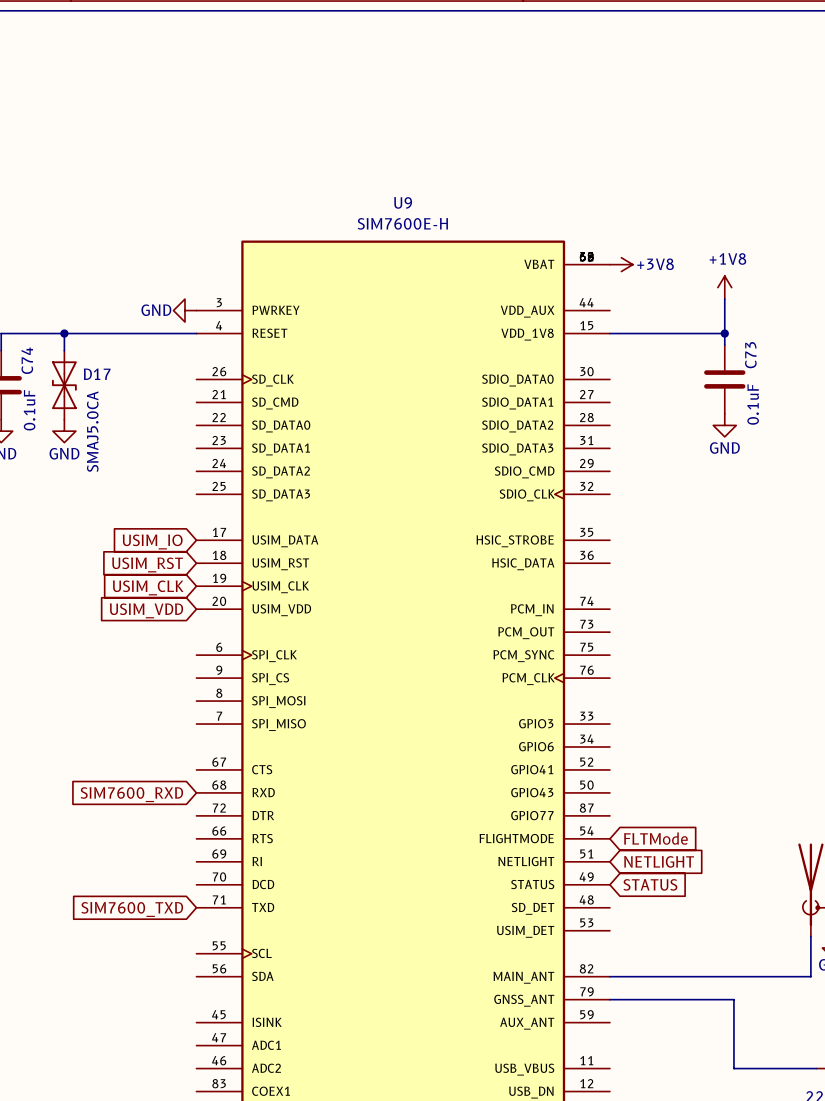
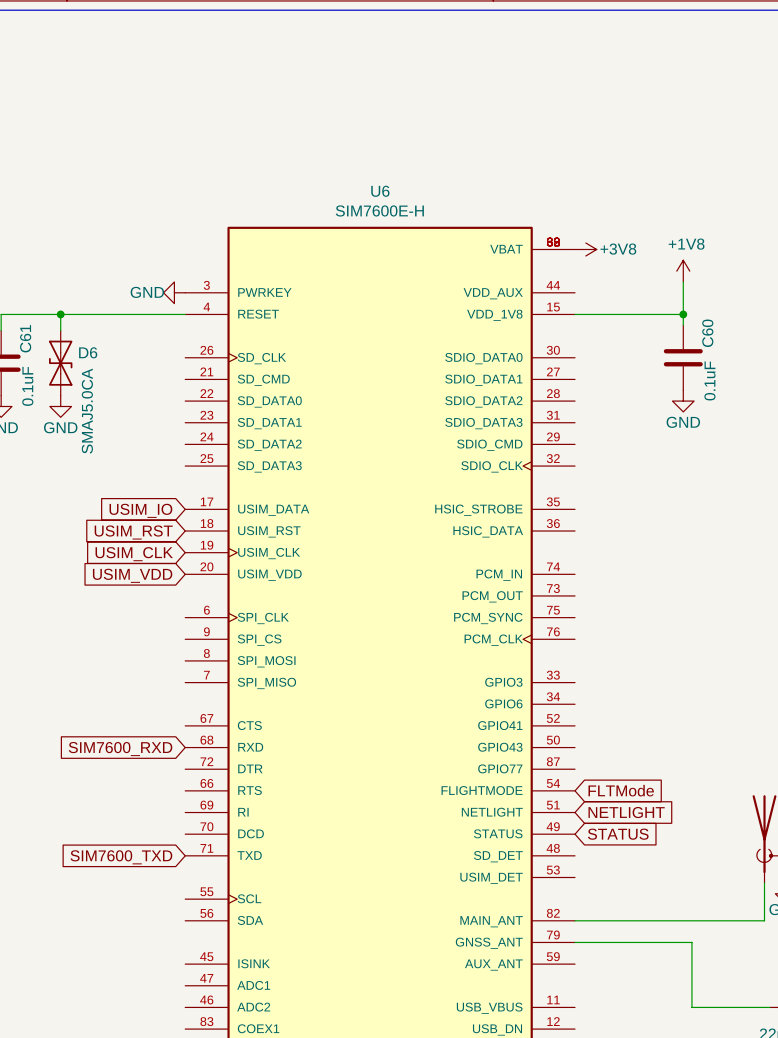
U9 name: U9 (403, 202) -> U6 (380, 191)
C73 name: C73 (750, 355) -> C60 (707, 333)
C74 name: C74 (27, 360) -> C61 (25, 338)
D17 name: D17 (97, 374) -> D6 (88, 352)

